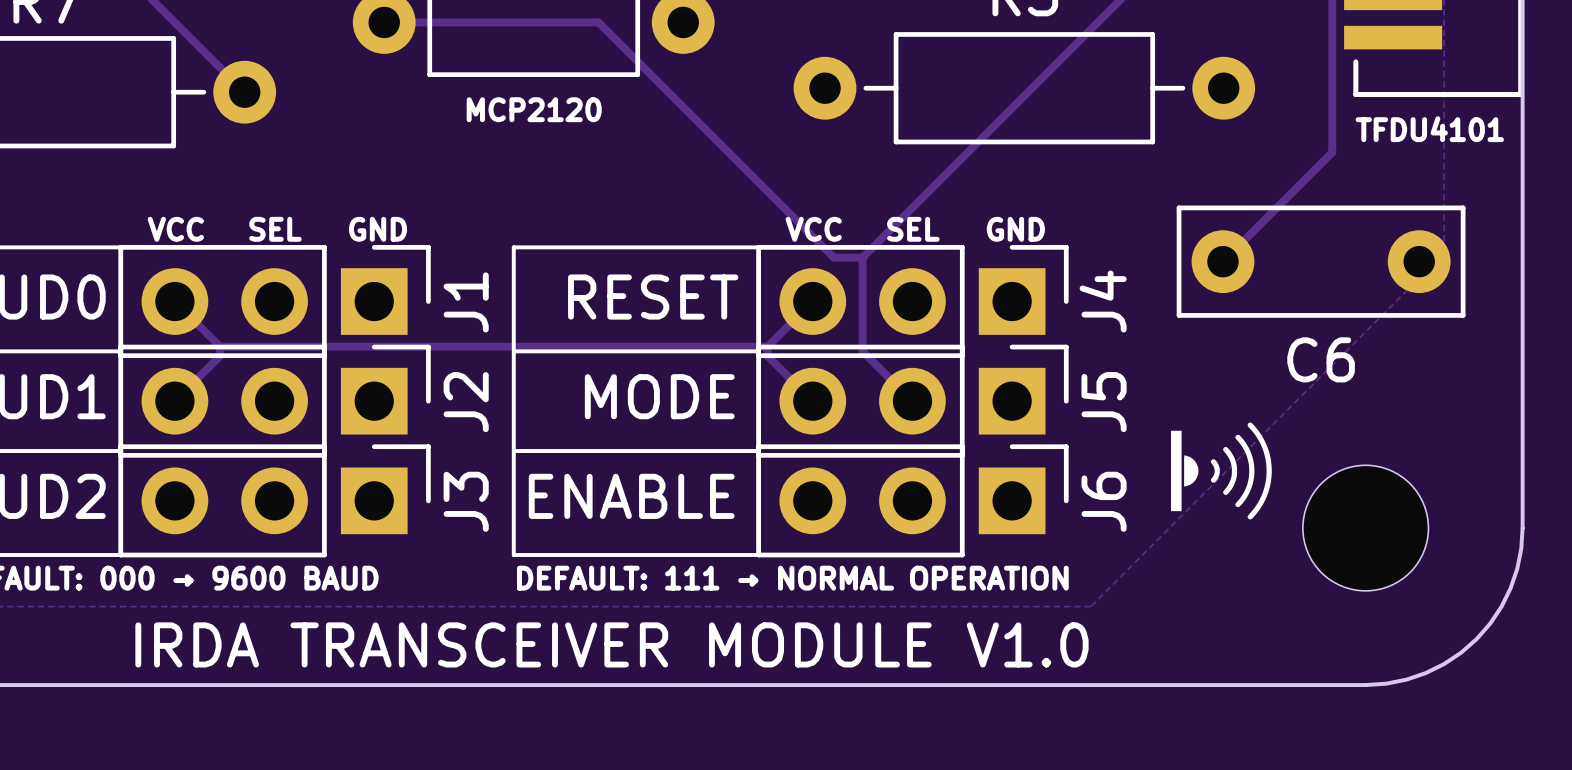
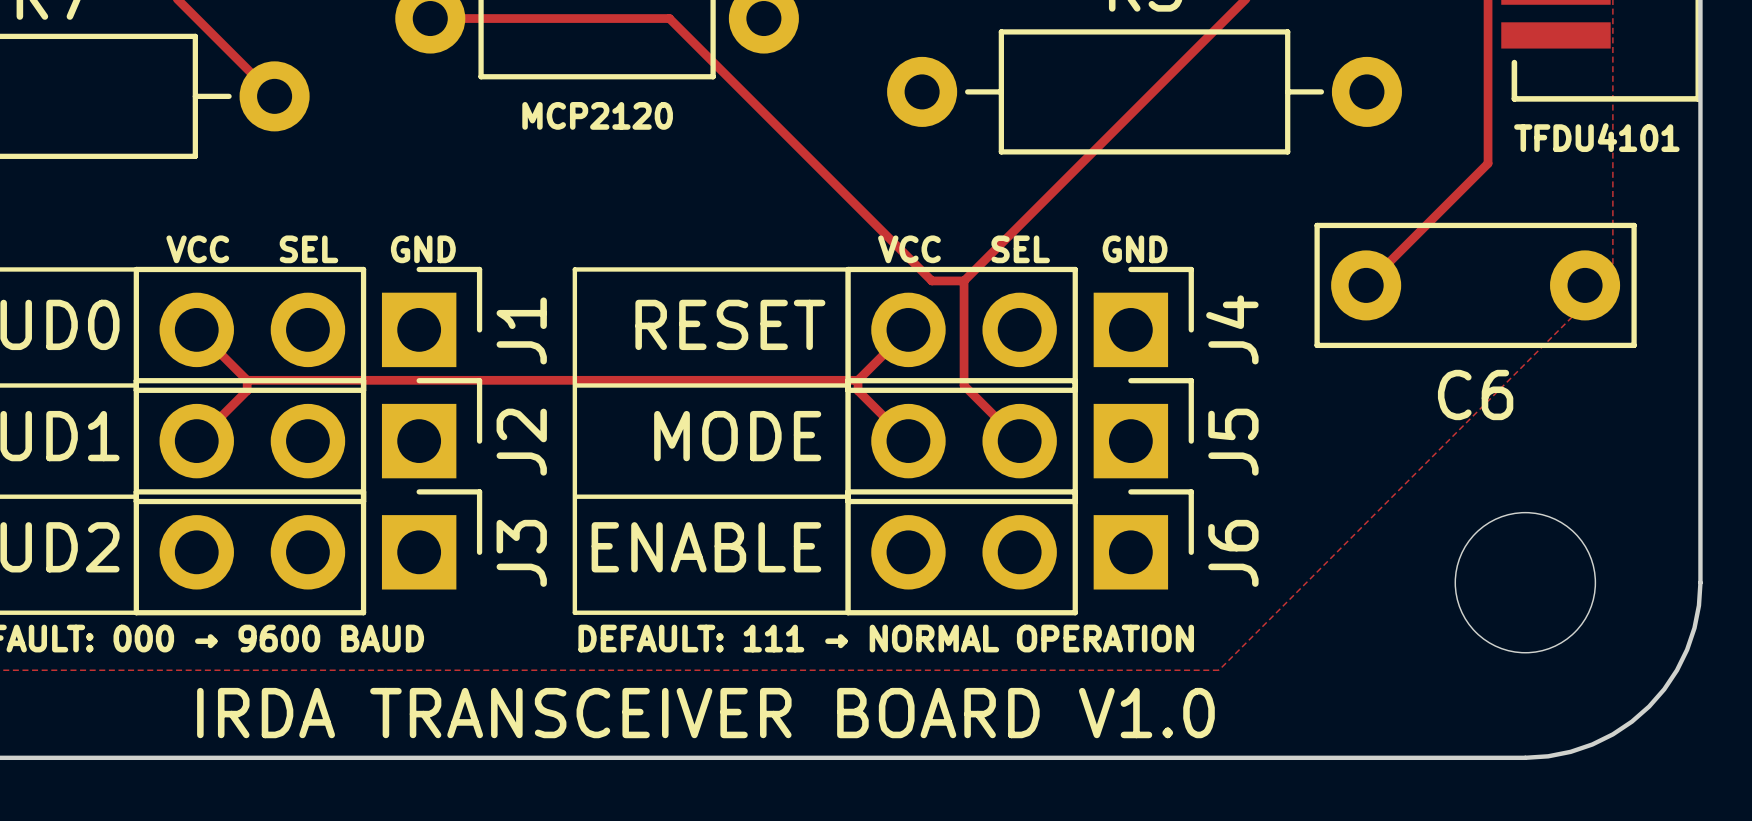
drawing: [1171, 422, 1272, 520] -> none
text: IRDA TRANSCEIVER MODULE V1.0 (611, 644) -> IRDA TRANSCEIVER BOARD V1.0 (705, 713)

